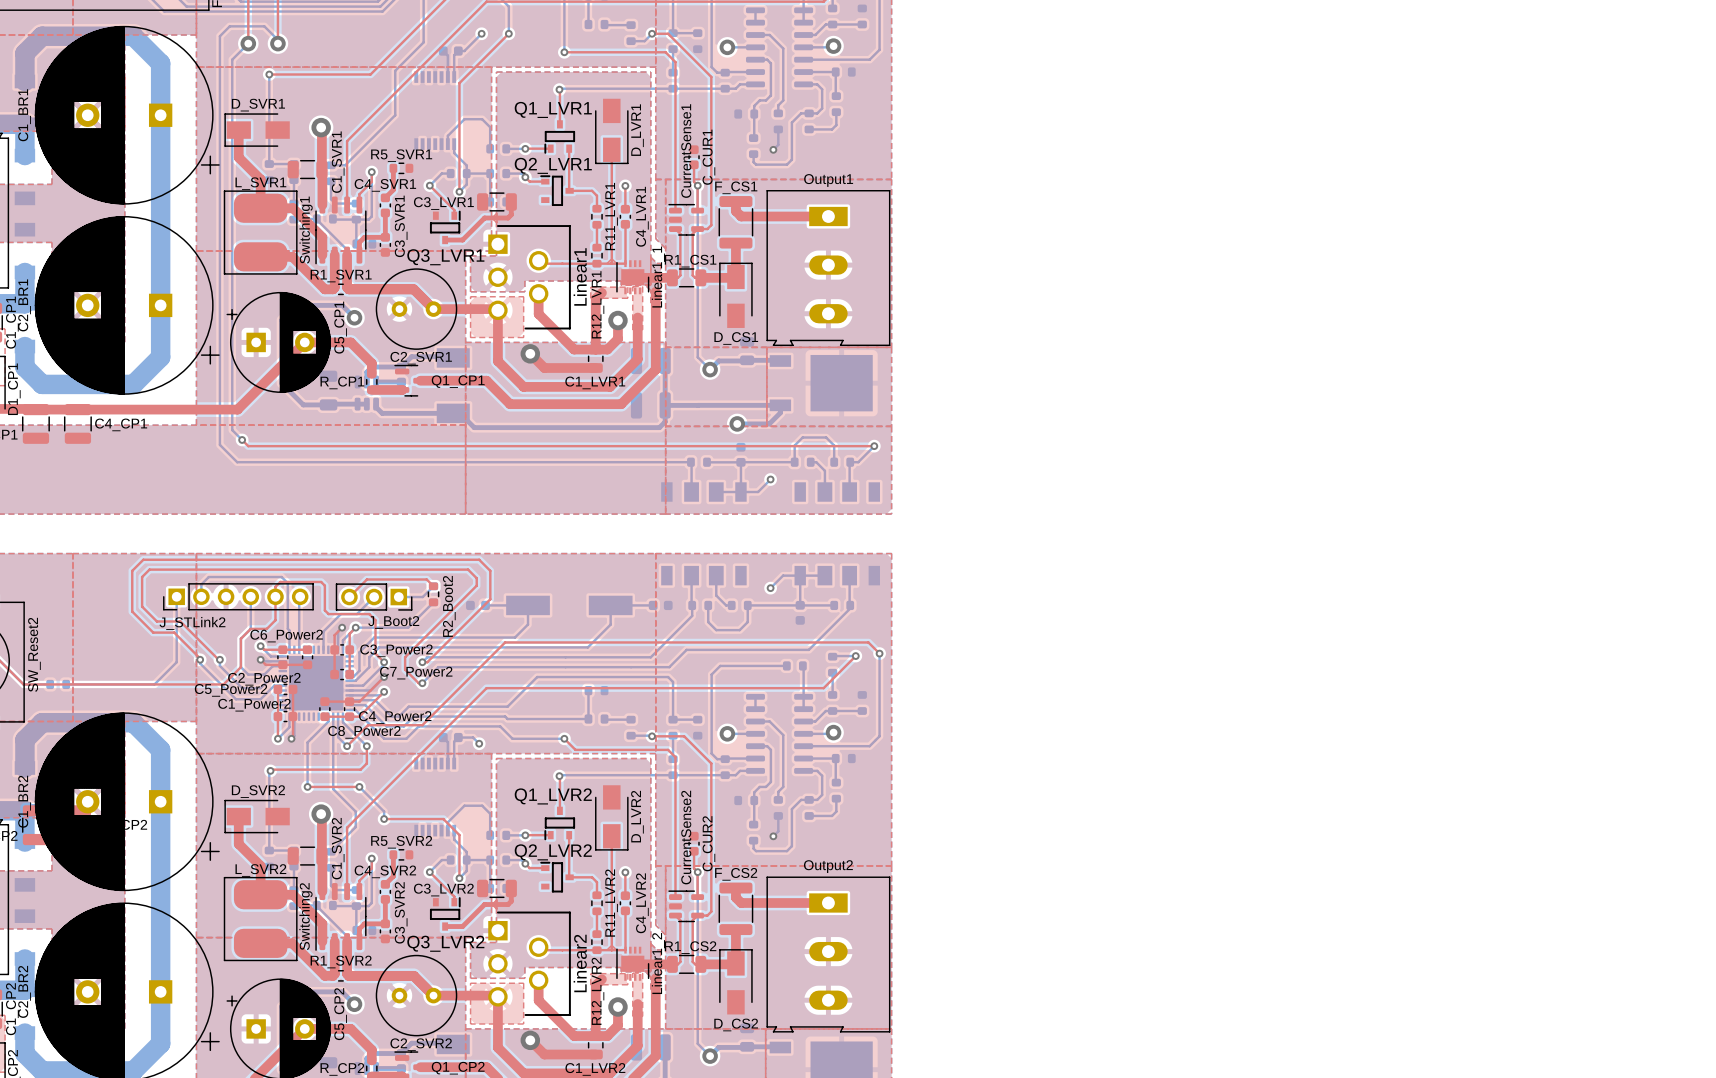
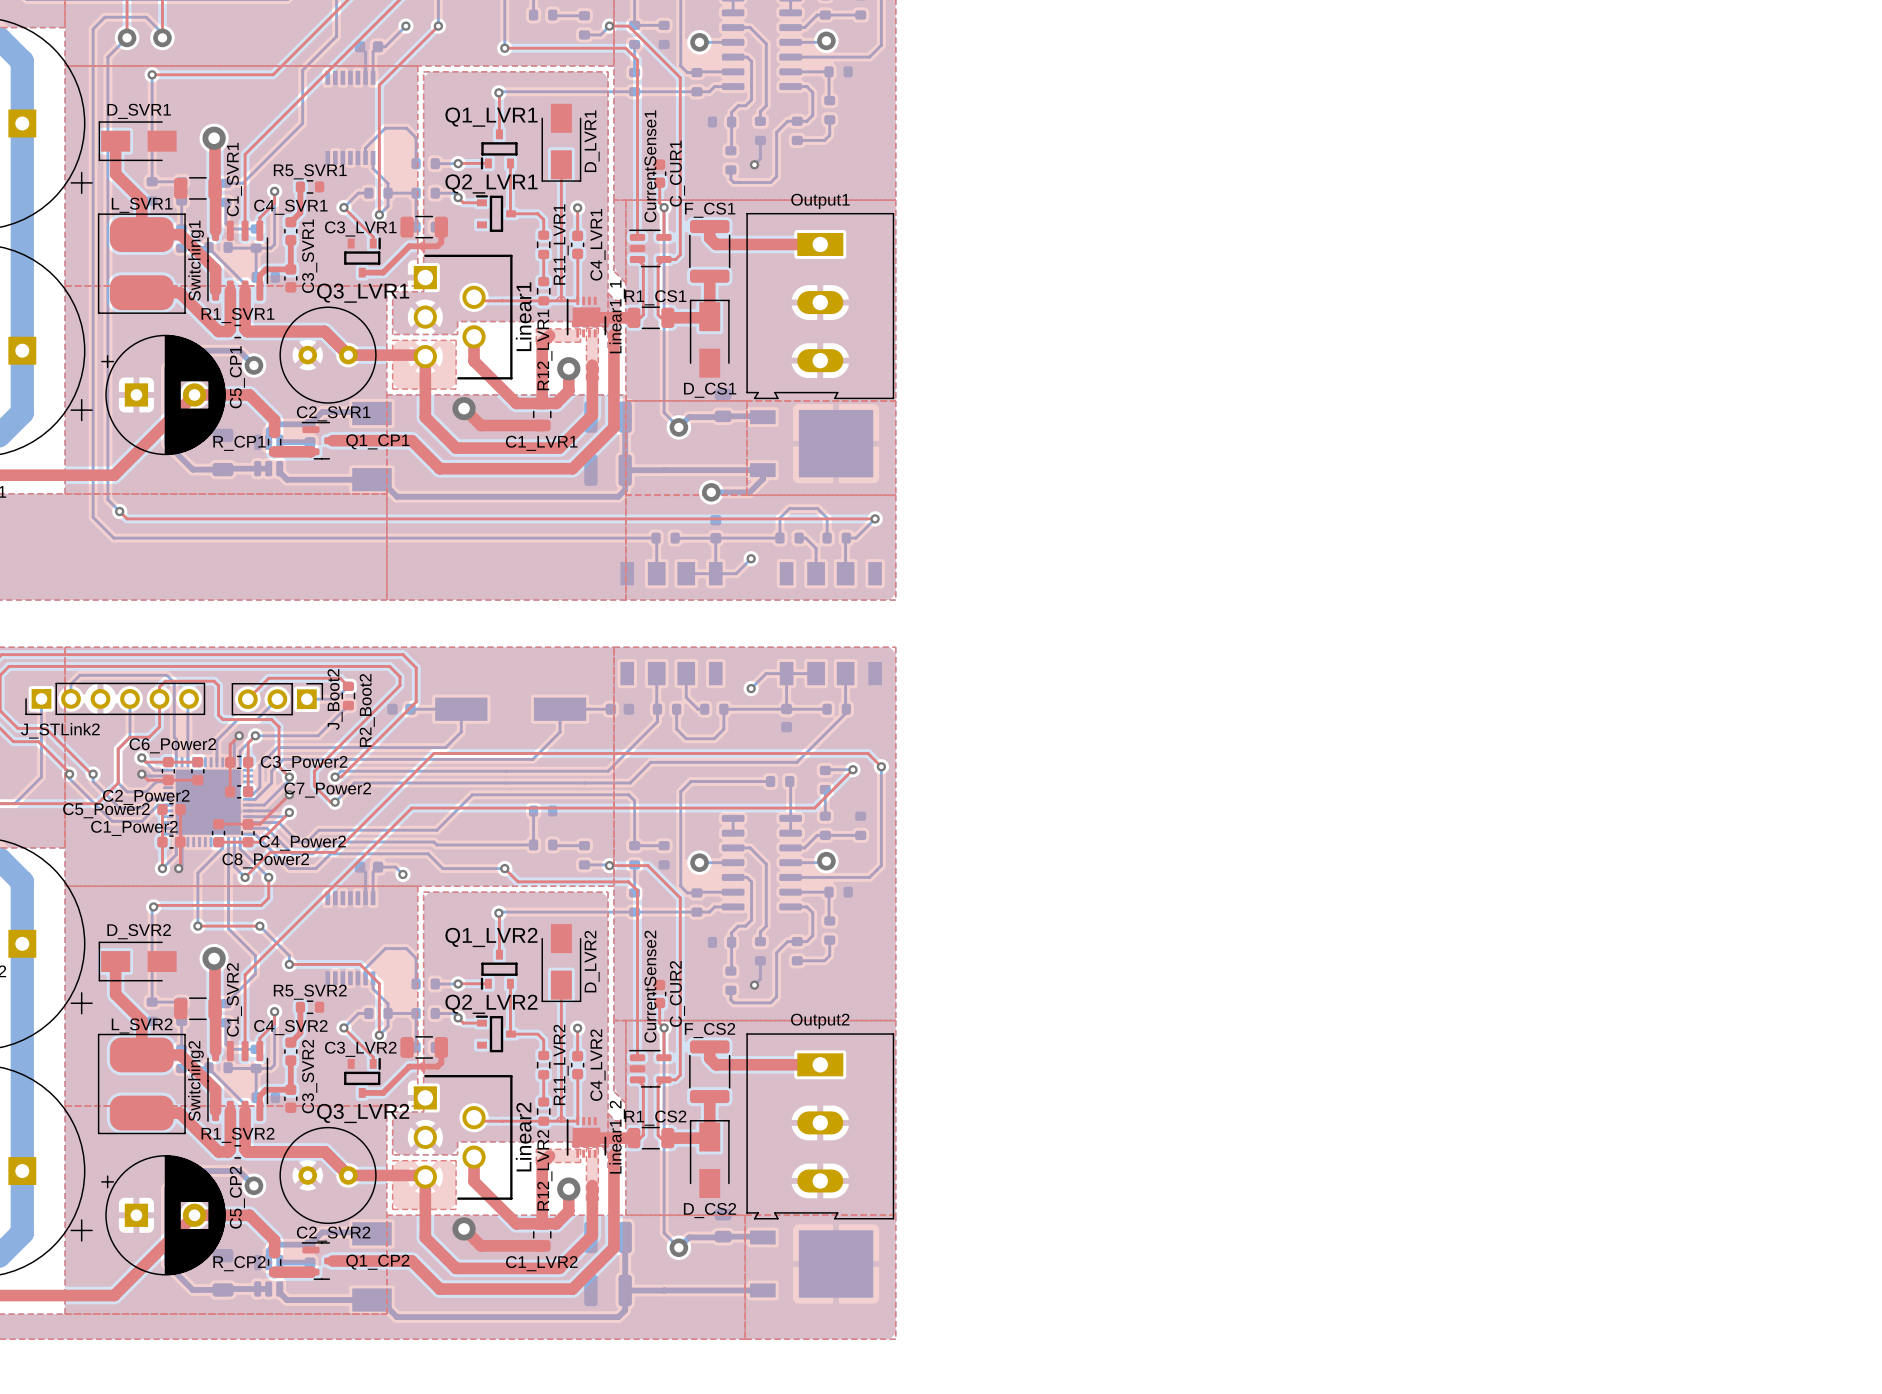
J_Boot2 footprint: [335, 583, 413, 611] -> [231, 683, 324, 716]
J_Boot2 name position: J_Boot2 (393, 622) -> J_Boot2 (335, 699)

